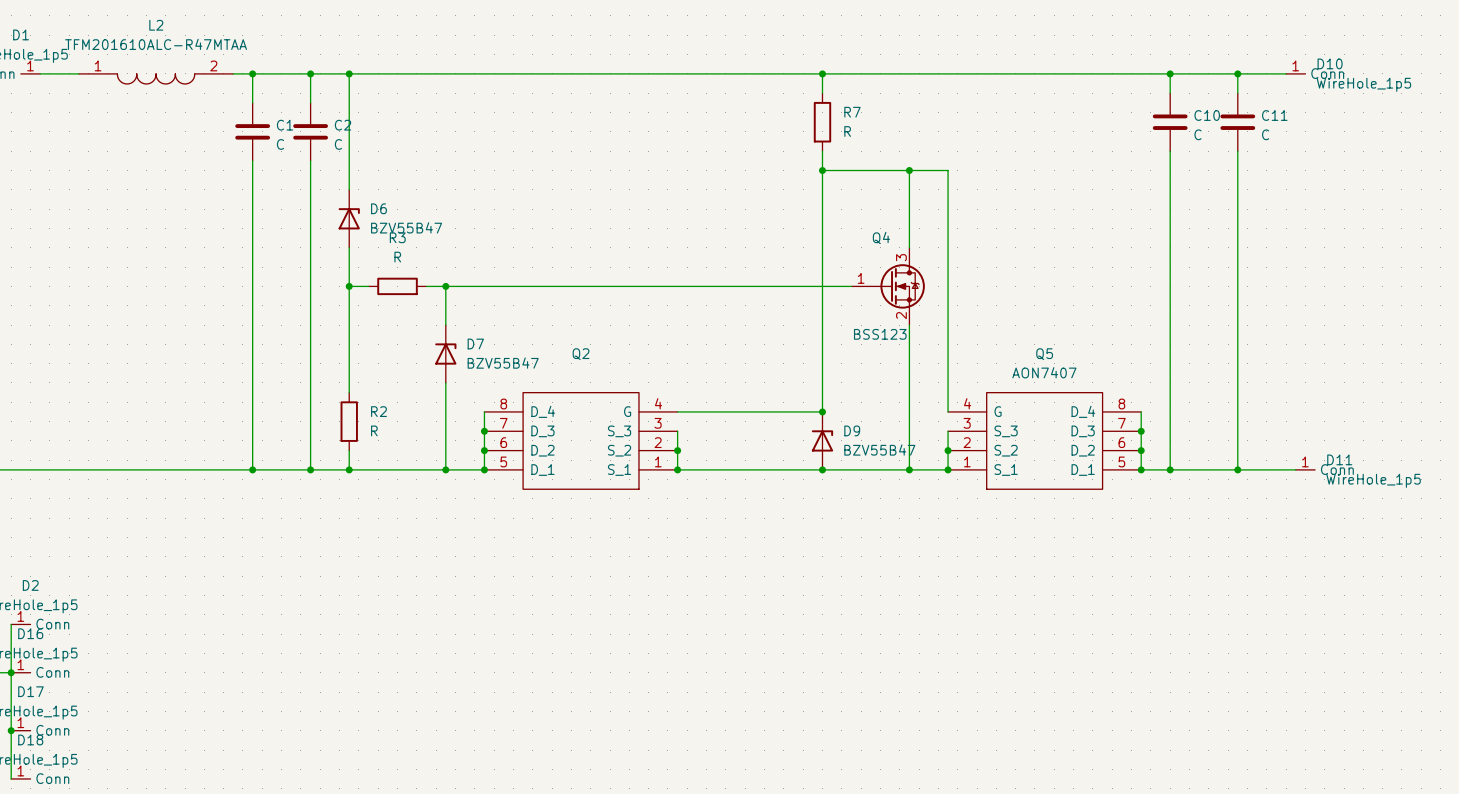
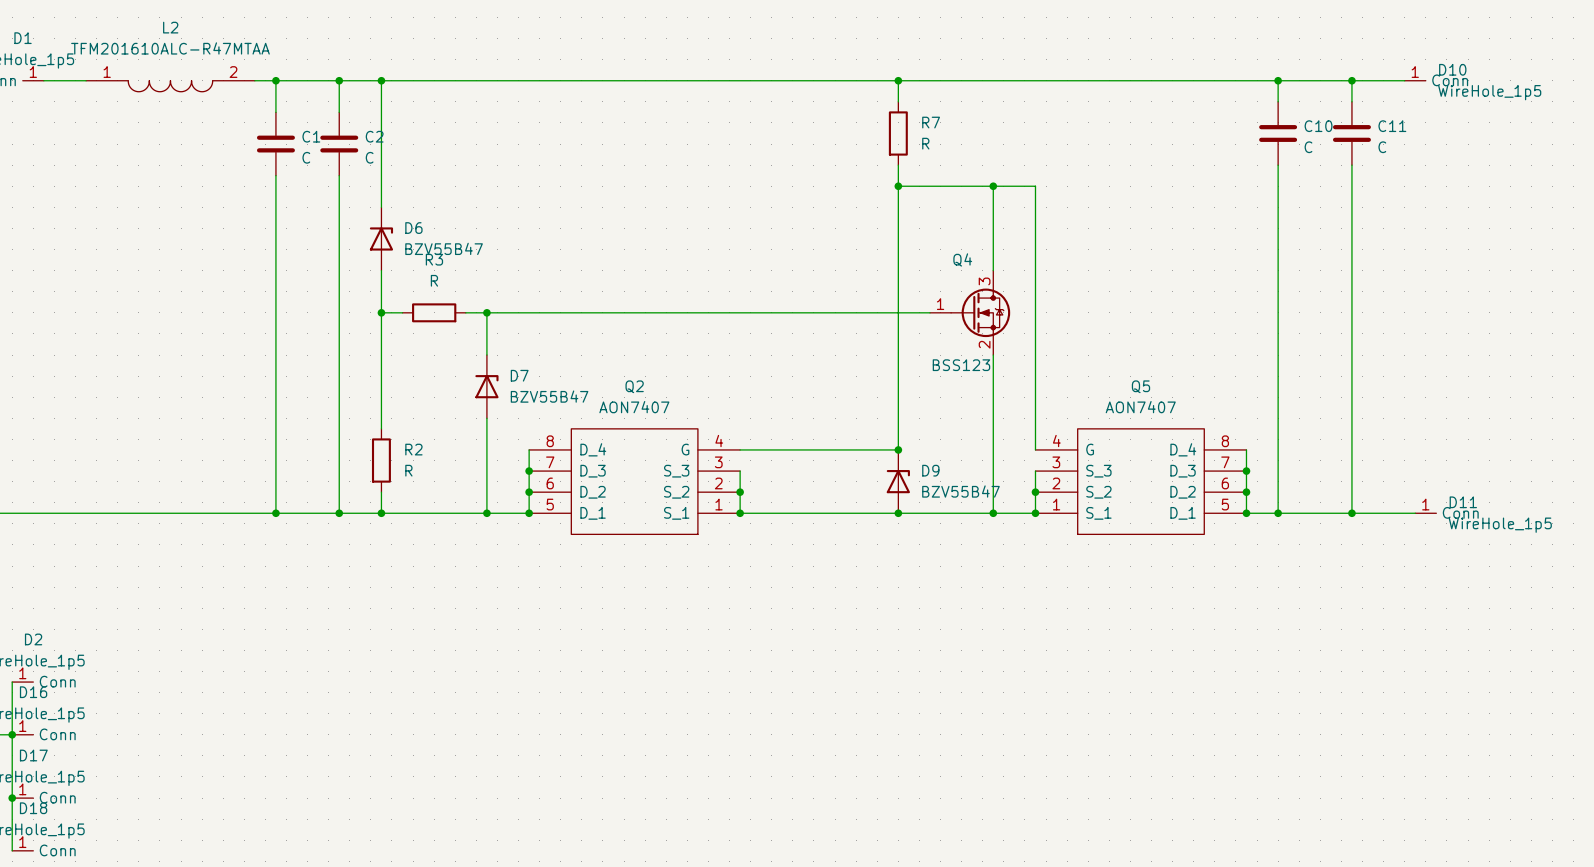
Q2 value: none -> AON7407 (634, 407)

